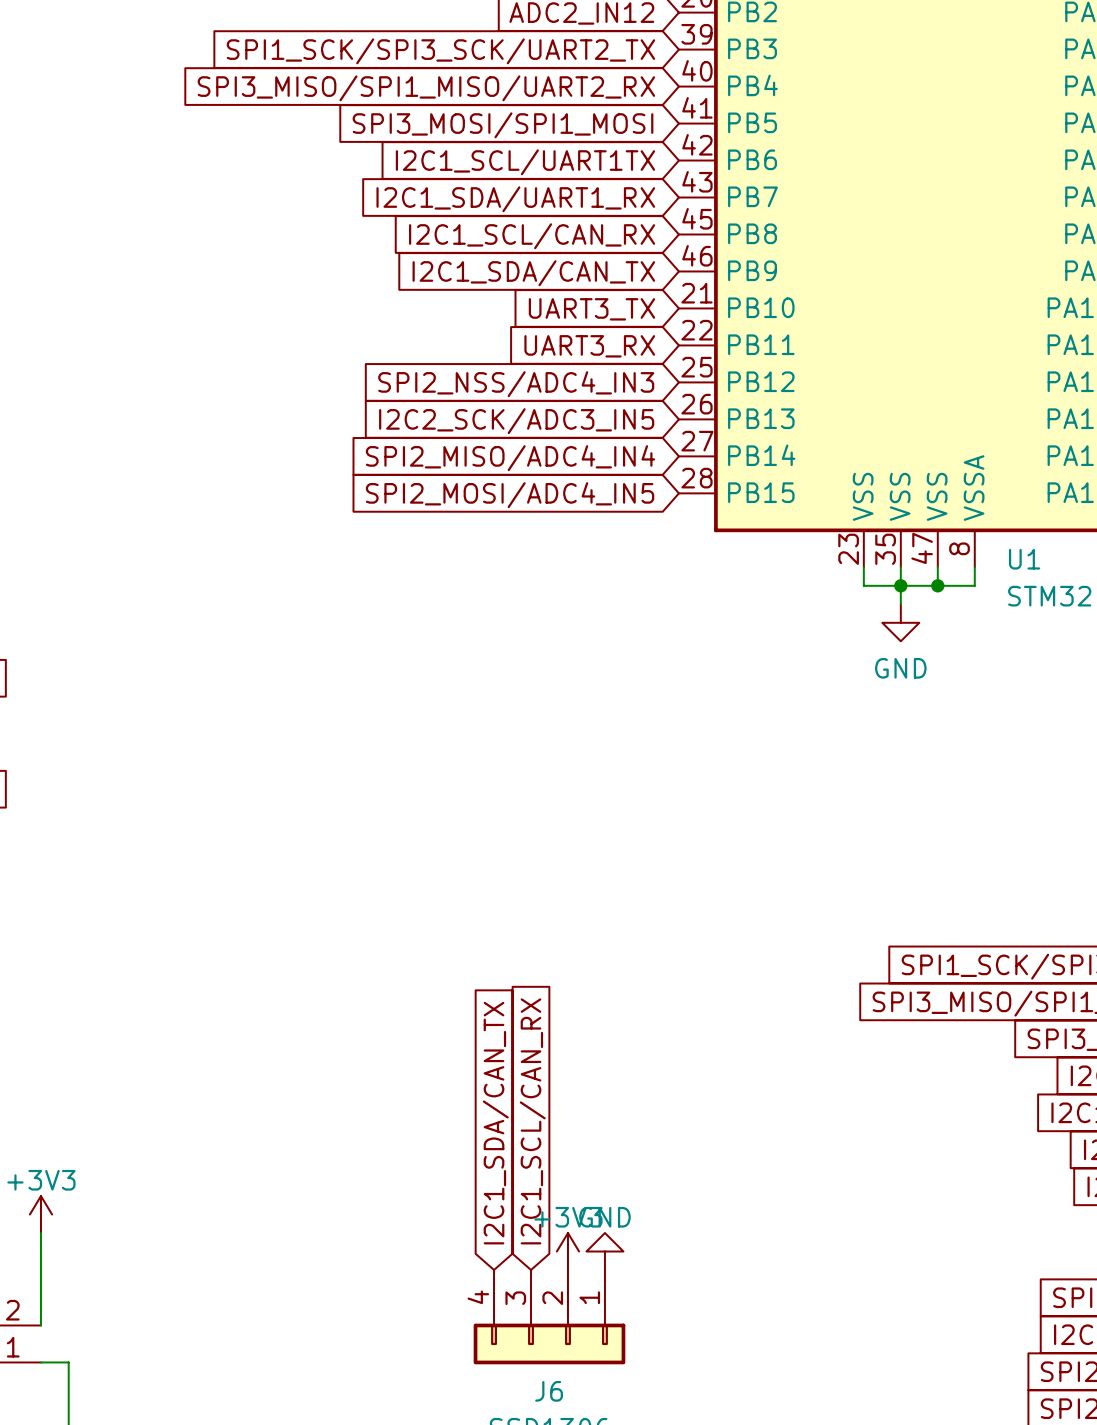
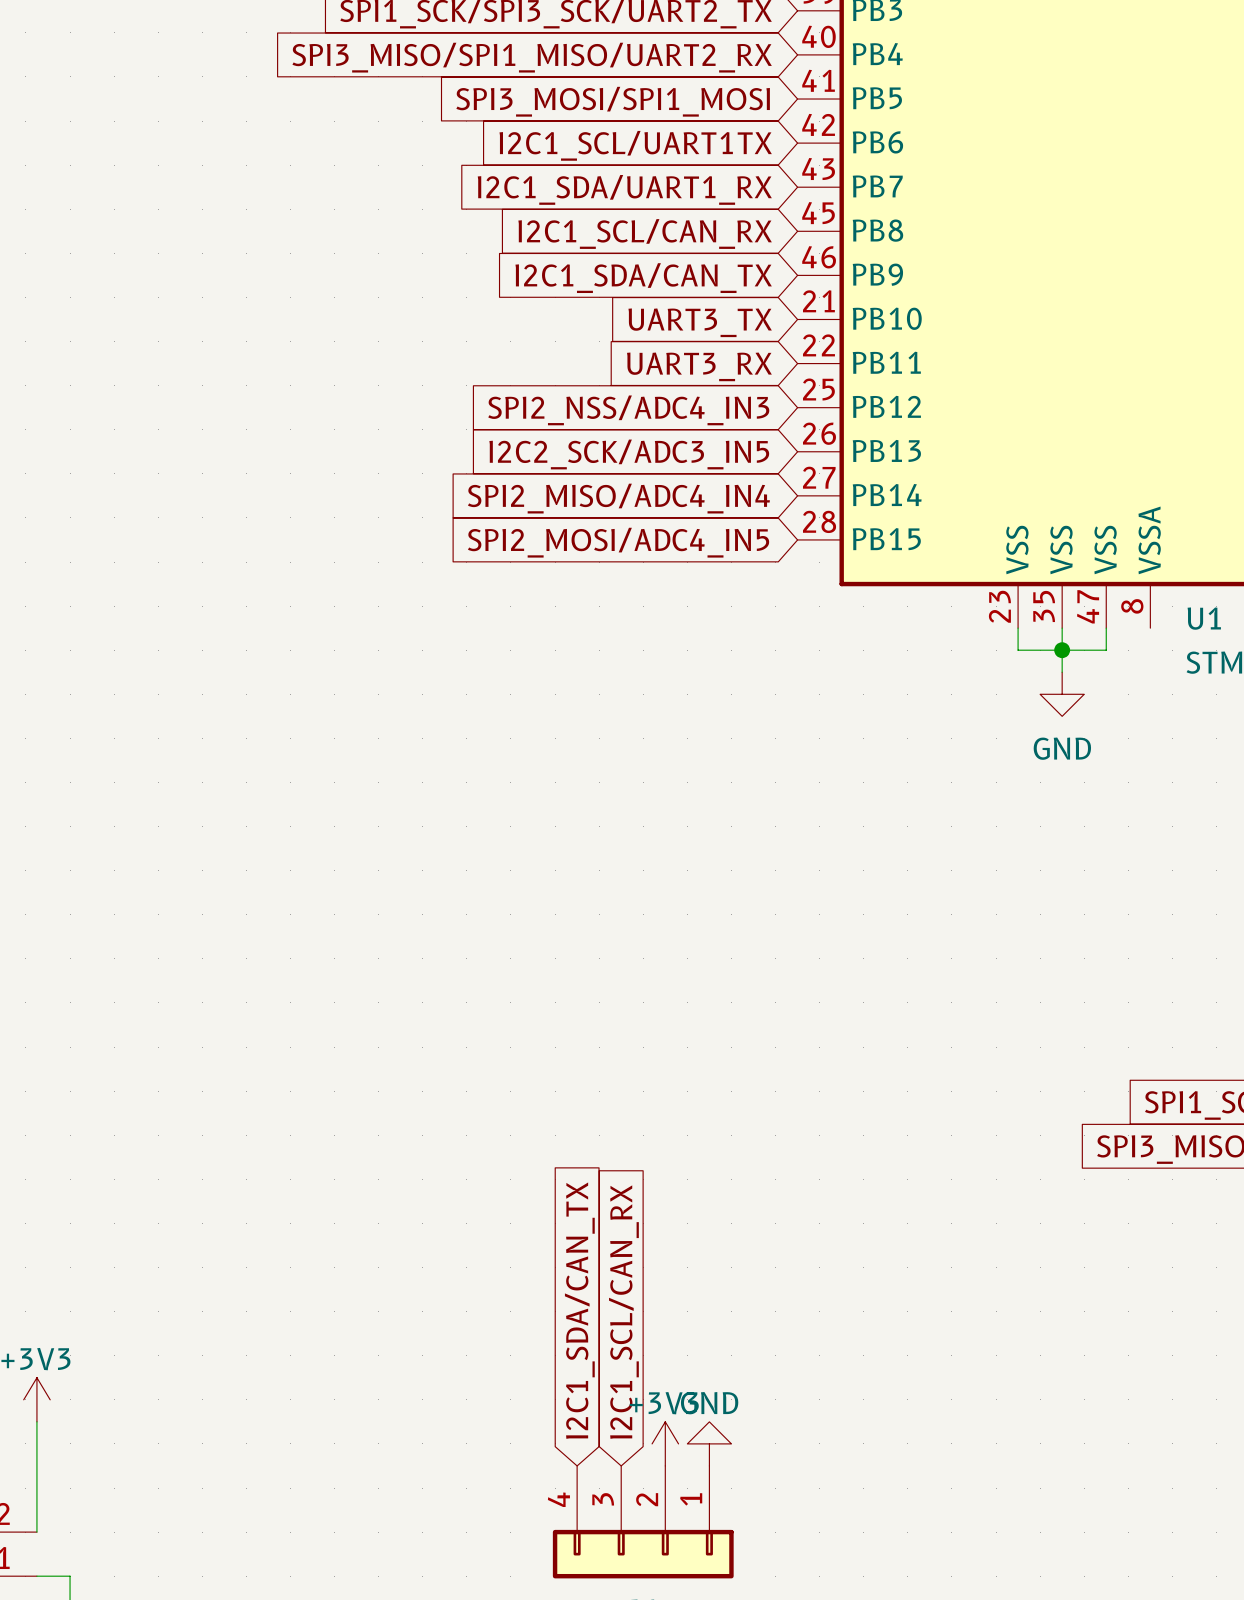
wire: (974, 567) (974, 585) (937, 585) -> none
junction: (937, 585) -> none

